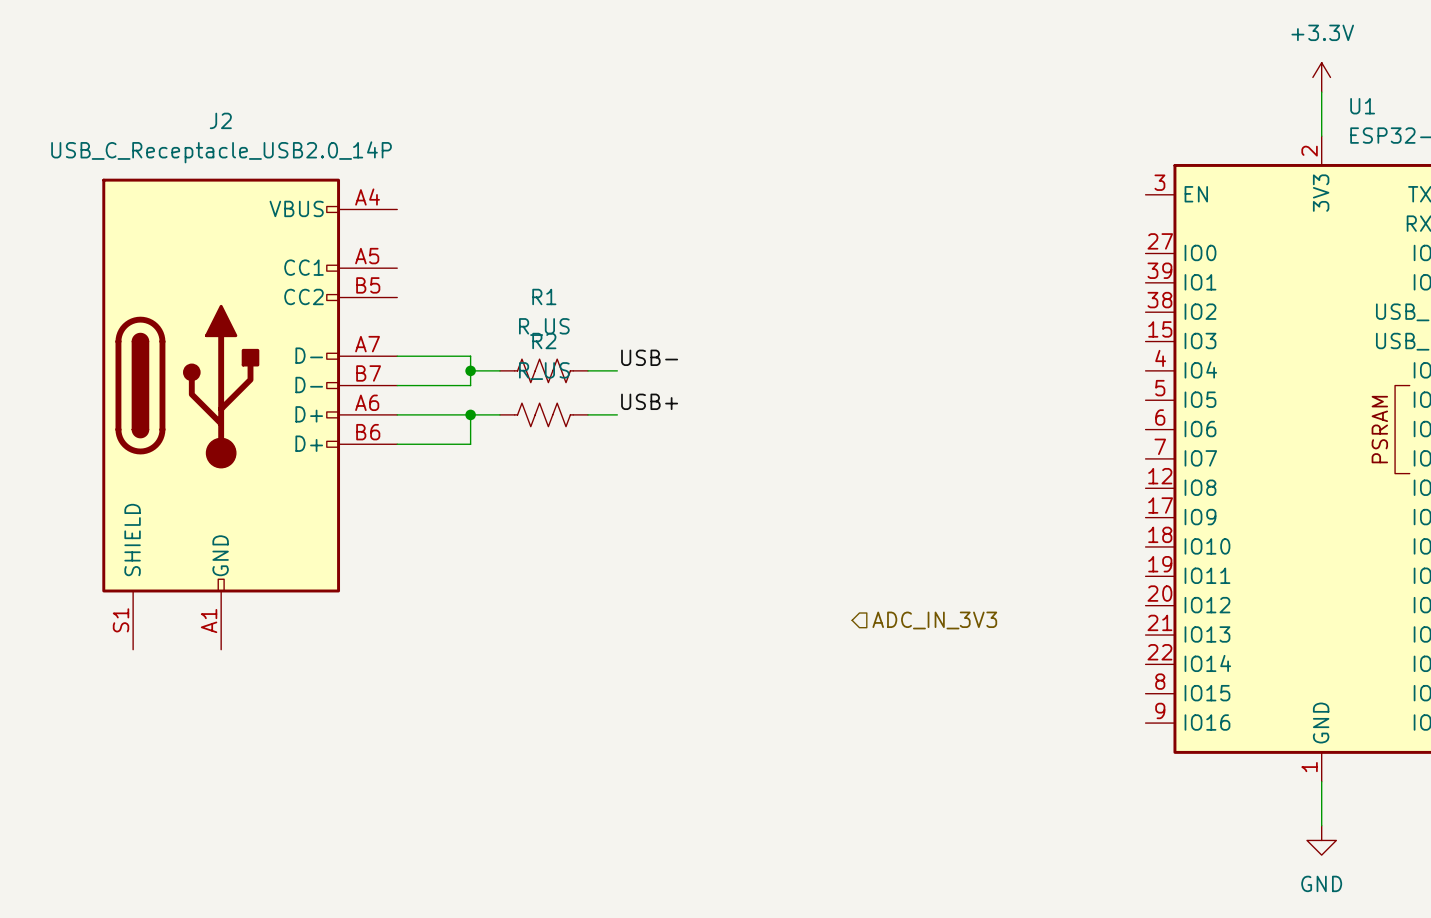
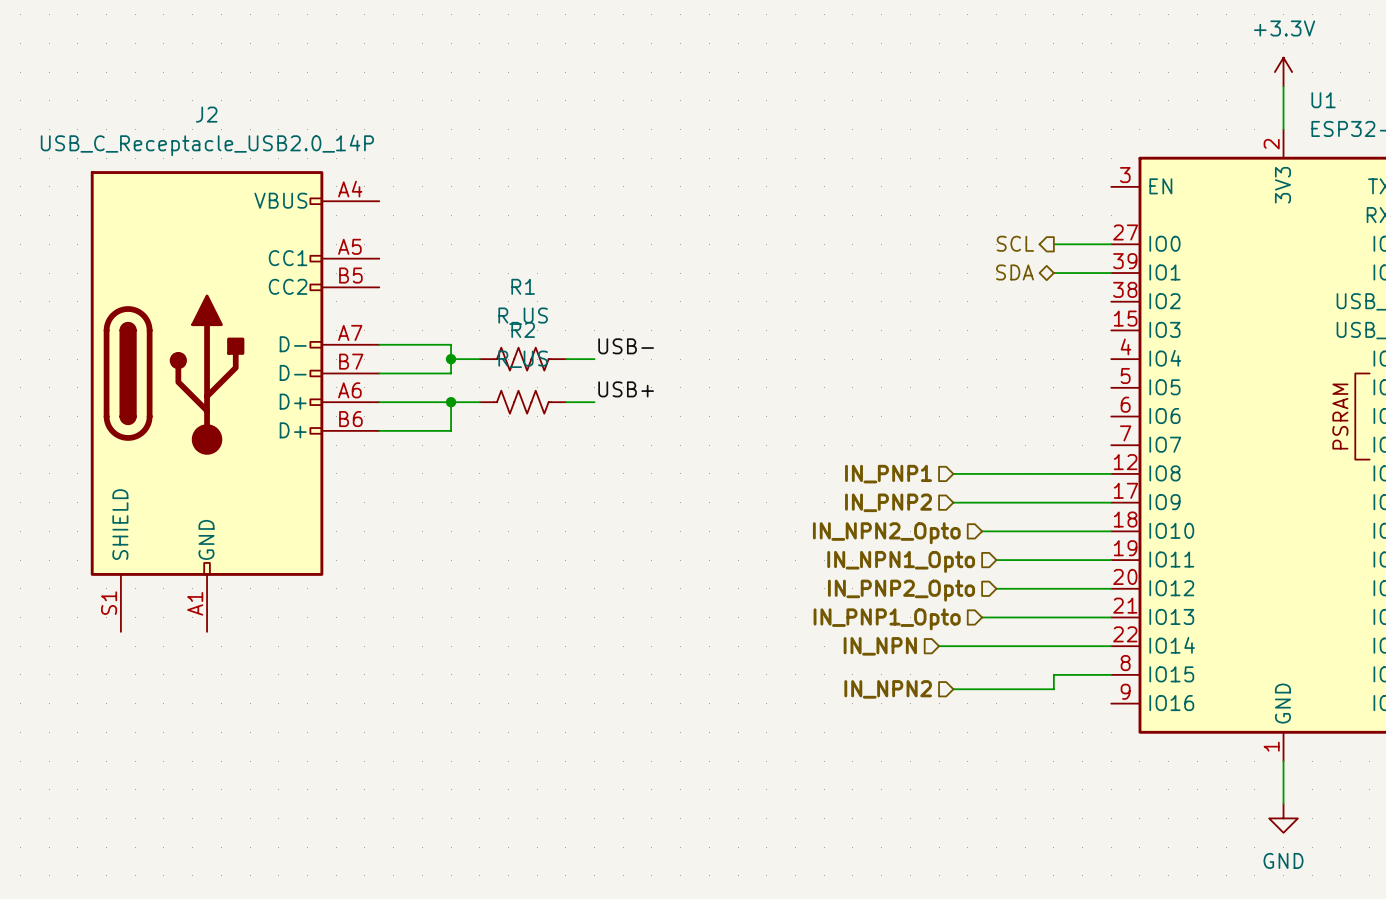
hierarchical label: none -> SCL (1015, 243)
wire: none -> (1053, 244) (1111, 244)
hierarchical label: none -> SDA (1015, 272)
wire: none -> (1053, 273) (1111, 273)
hierarchical label: none -> IN_PNP1 (888, 474)
wire: none -> (953, 473) (1111, 473)
hierarchical label: none -> IN_PNP2 (888, 502)
wire: none -> (953, 502) (1111, 502)
wire: none -> (982, 531) (1111, 531)
hierarchical label: none -> IN_NPN2_Opto (886, 533)
wire: none -> (996, 560) (1111, 560)
hierarchical label: none -> IN_NPN1_Opto (901, 561)
wire: none -> (996, 588) (1111, 588)
hierarchical label: none -> IN_PNP2_Opto (901, 590)
hierarchical label: ADC_IN_3V3 (934, 620) -> none
wire: none -> (982, 617) (1111, 617)
hierarchical label: none -> IN_PNP1_Opto (887, 619)
hierarchical label: none -> IN_NPN (880, 646)
wire: none -> (939, 646) (1111, 646)
wire: none -> (1111, 674) (1053, 674) (1053, 689) (953, 689)
hierarchical label: none -> IN_NPN2 (888, 689)

